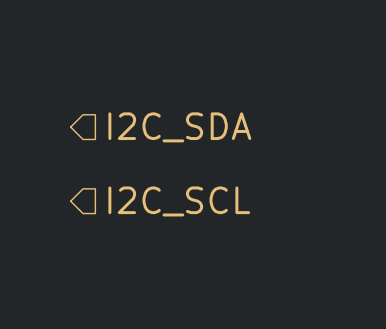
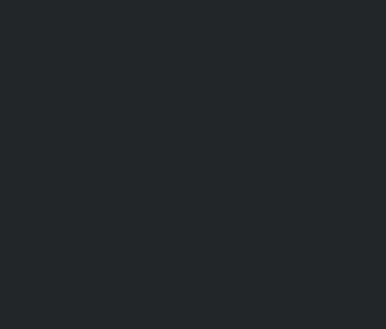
hierarchical label: I2C_SDA (179, 127) -> none
hierarchical label: I2C_SCL (179, 201) -> none

